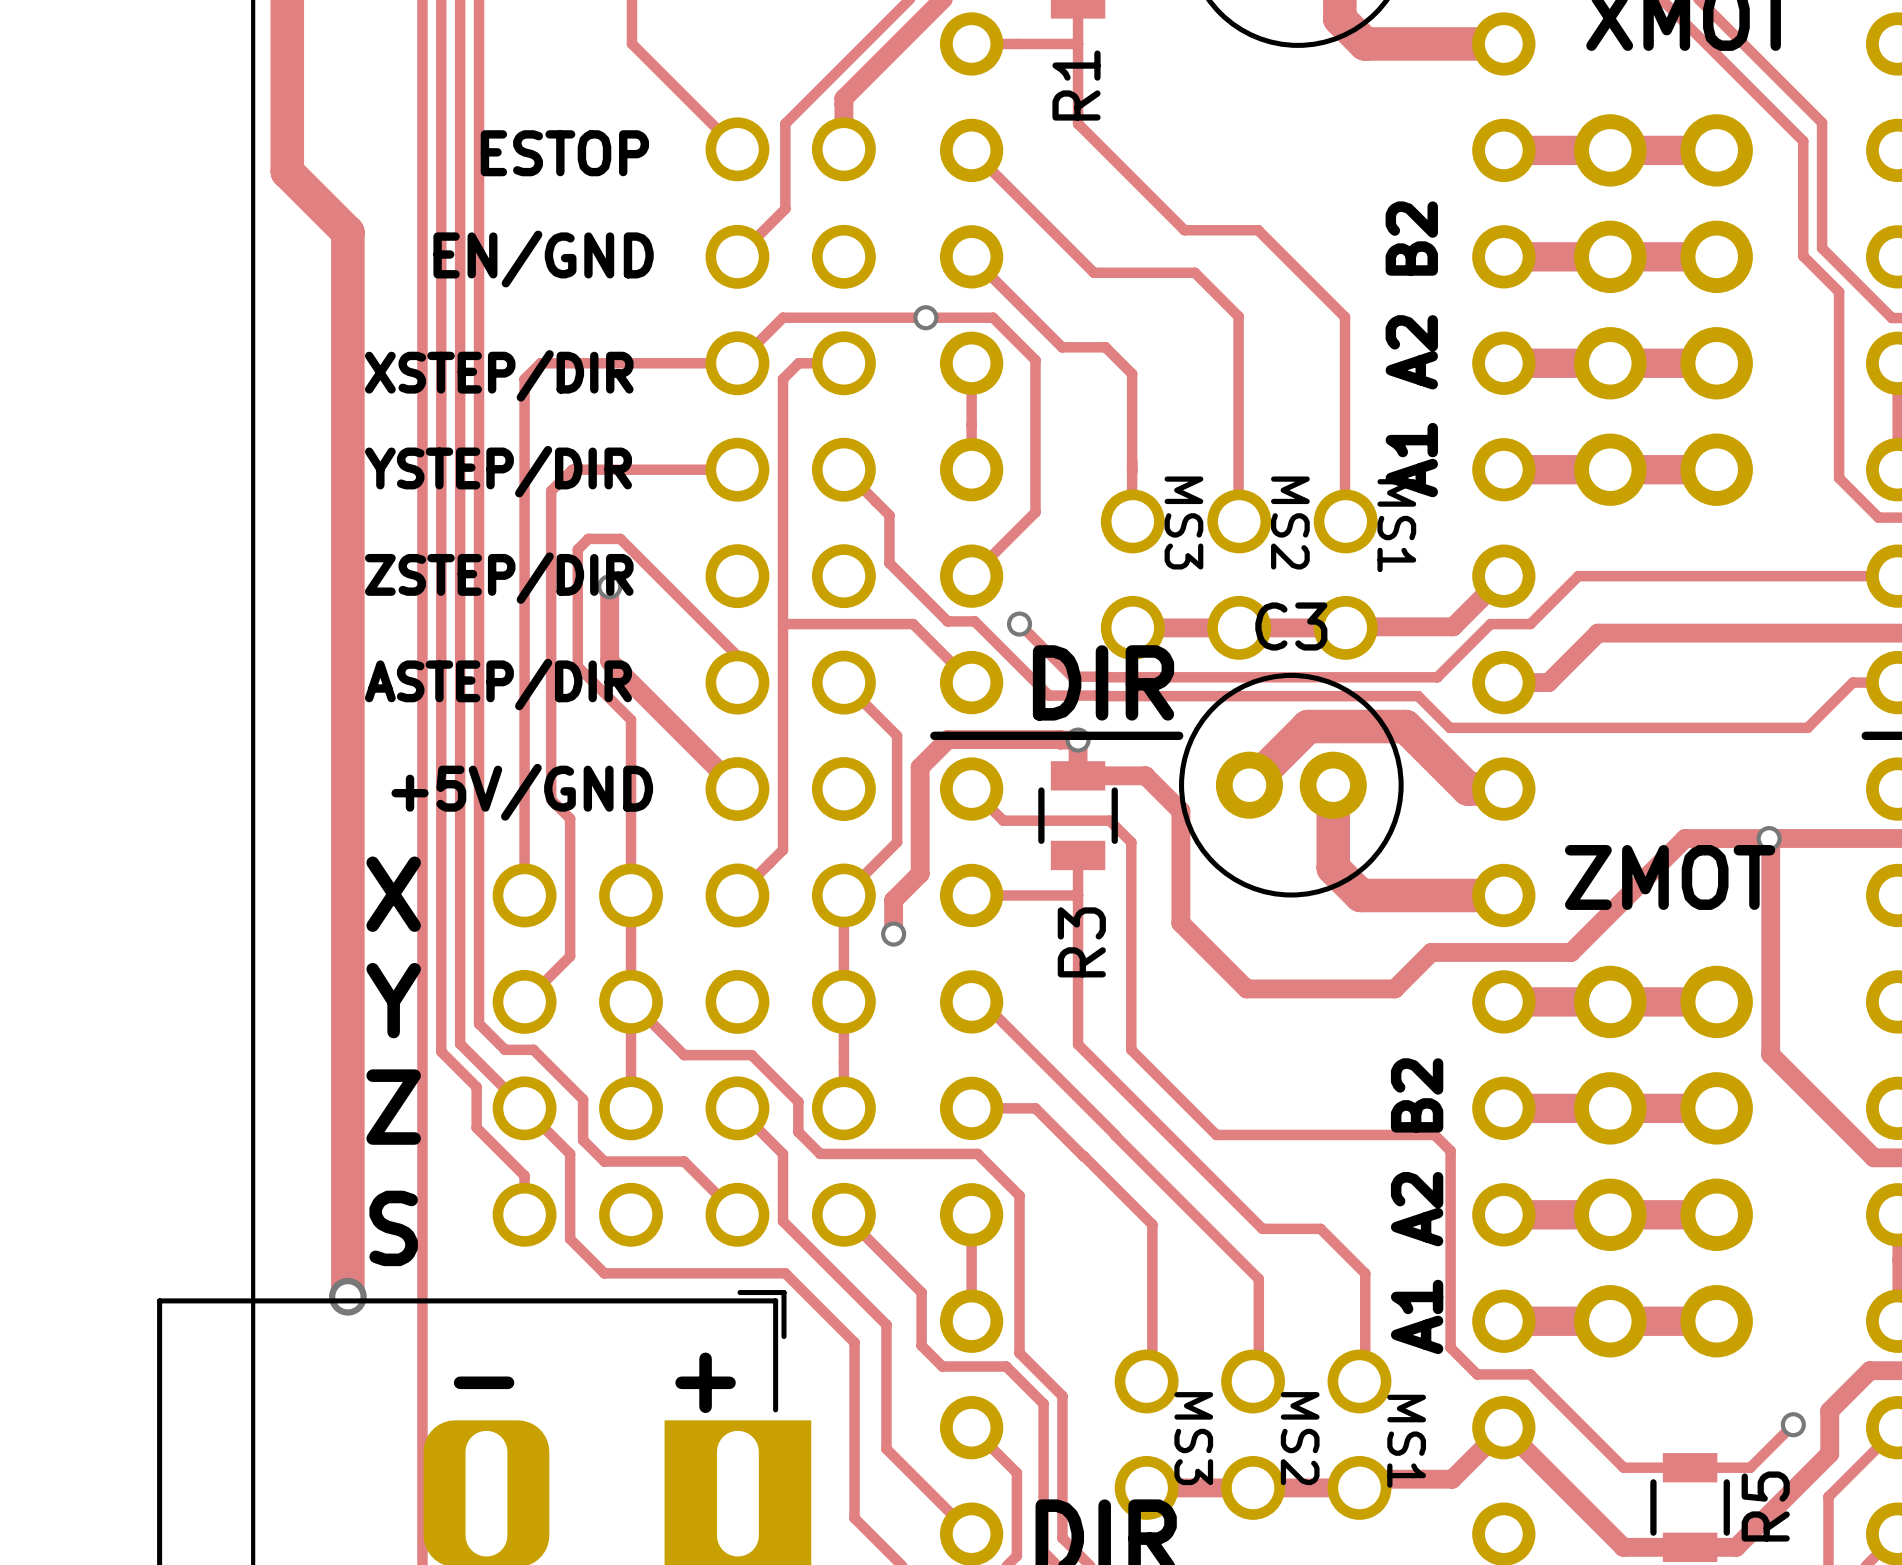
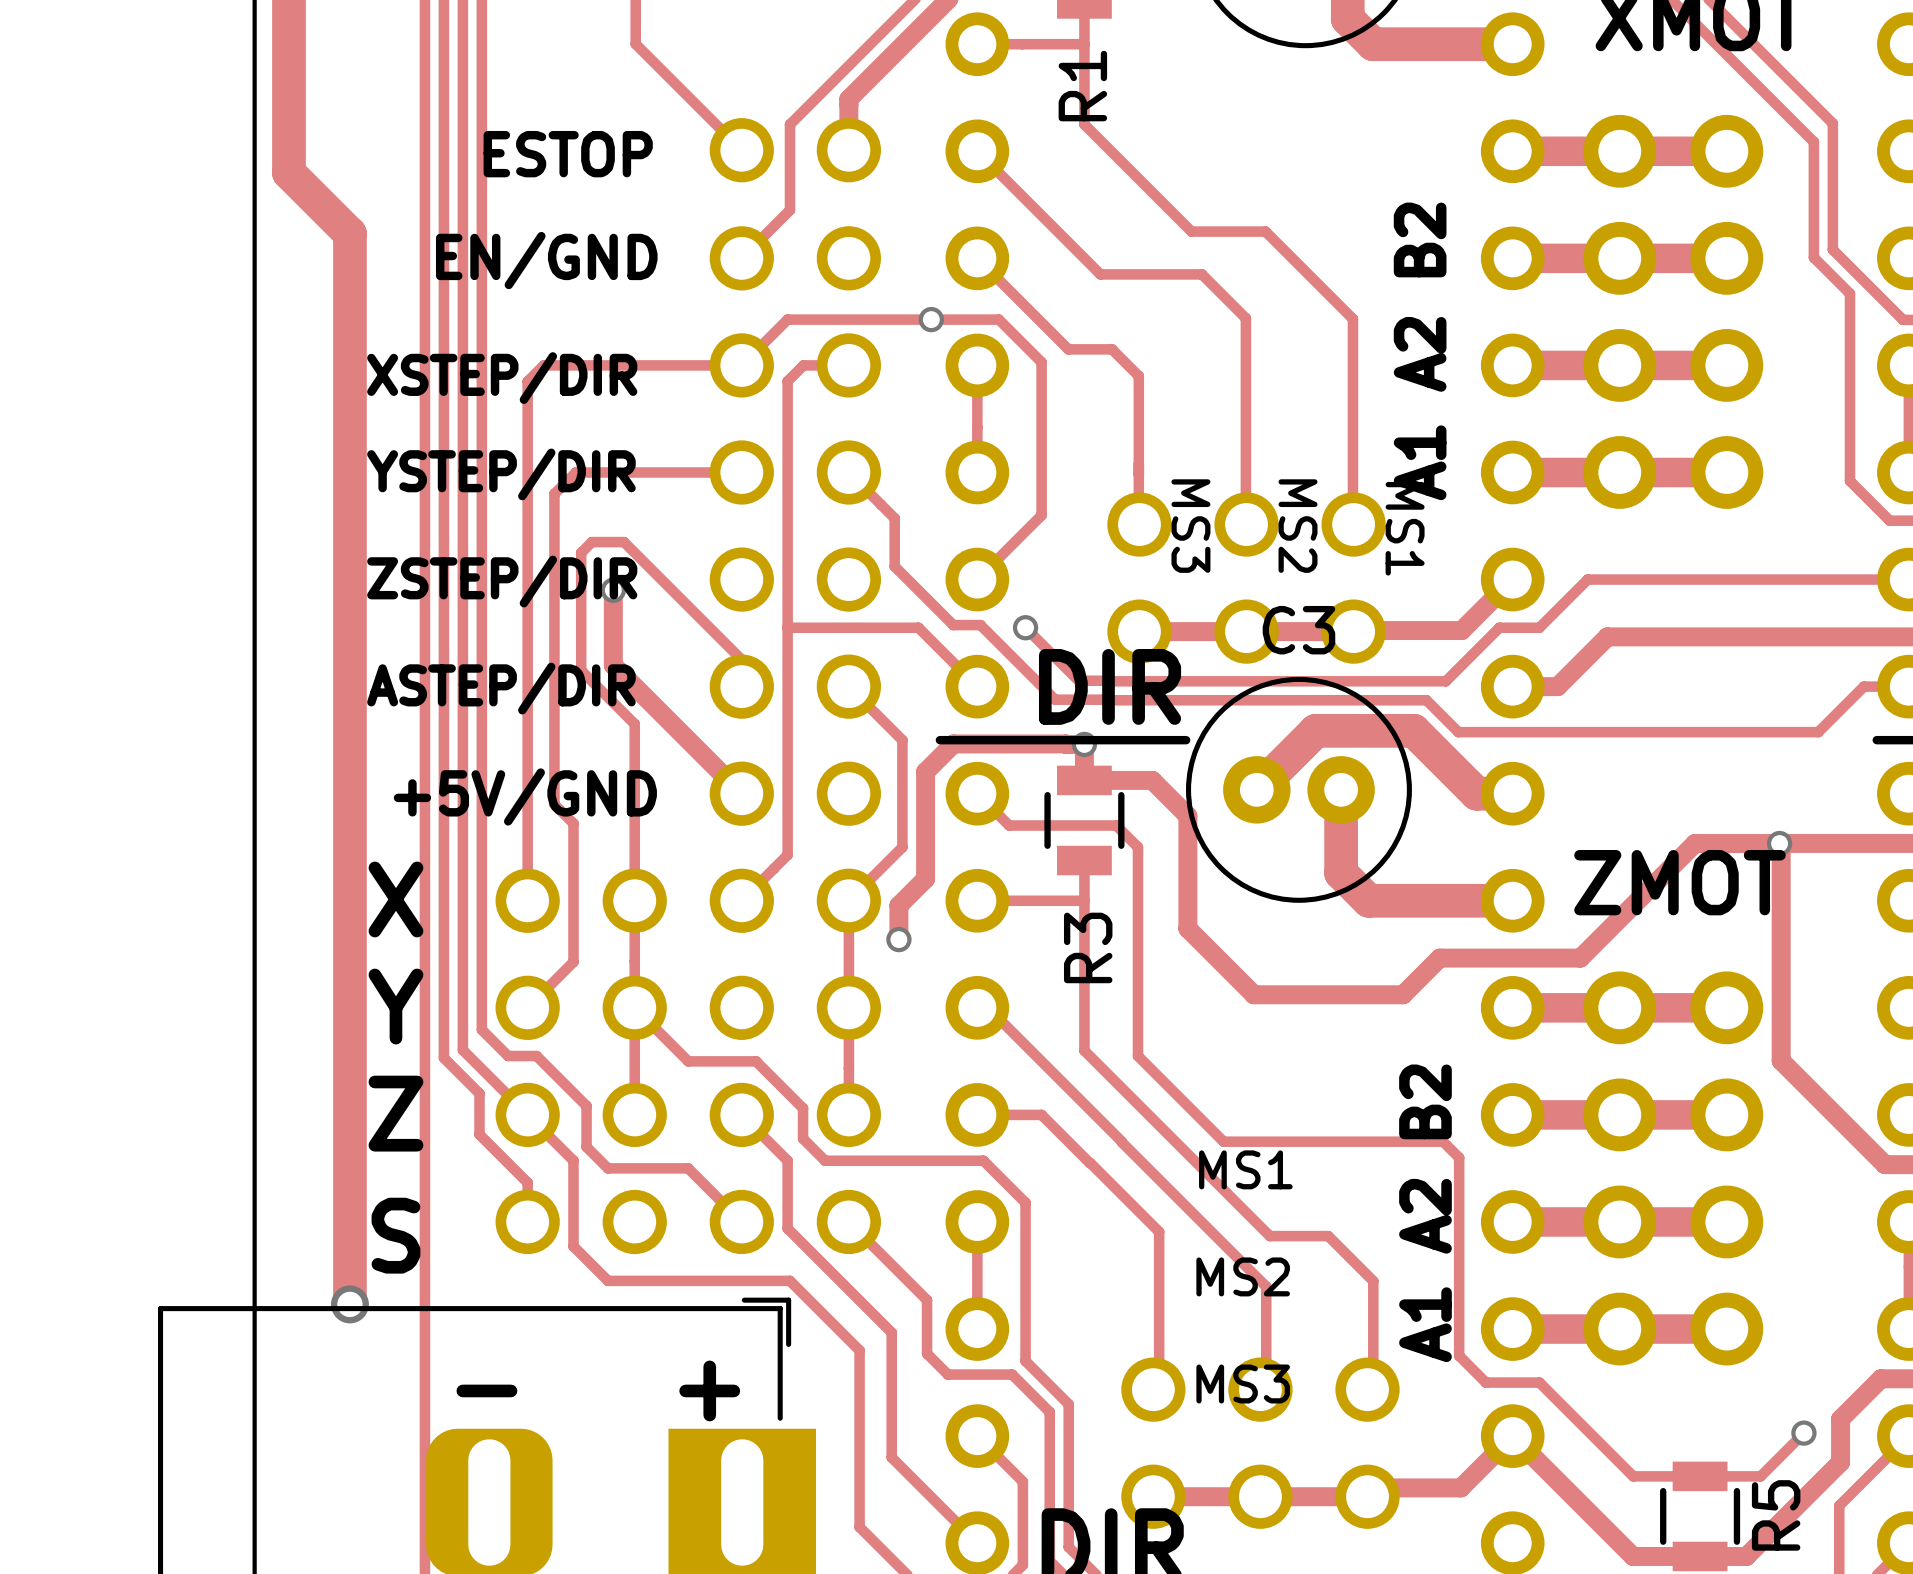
text rotation: 0° (1193, 1438) -> 90° counterclockwise (1243, 1384)
text rotation: 0° (1300, 1438) -> 90° counterclockwise (1243, 1276)
text position: MS2 (1300, 1438) -> MS2 (1243, 1276)
text rotation: 0° (1406, 1441) -> 90° counterclockwise (1245, 1169)
text position: MS1 (1406, 1441) -> MS1 (1245, 1169)

